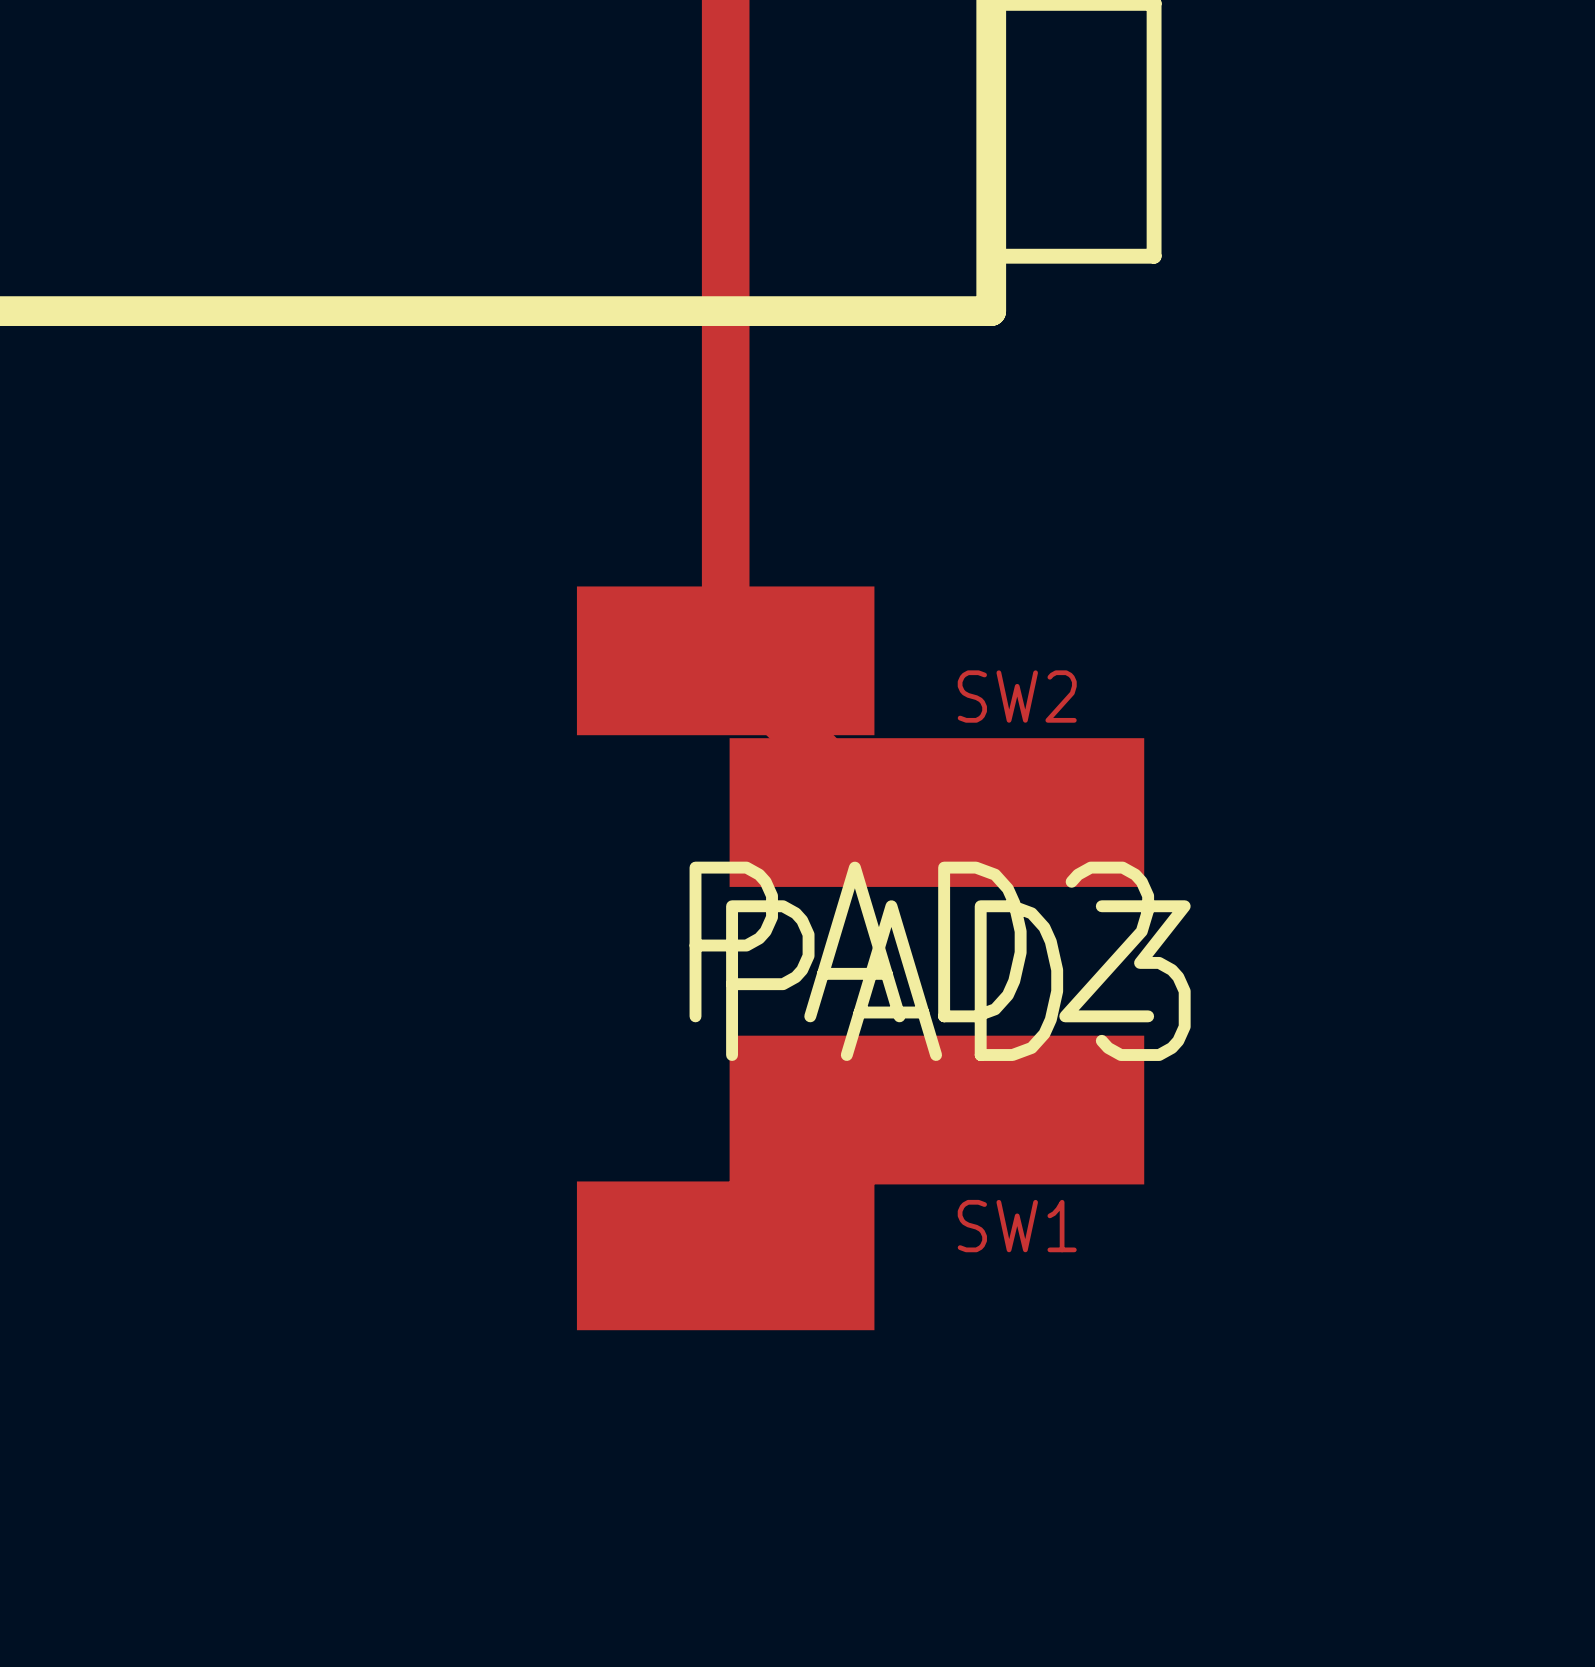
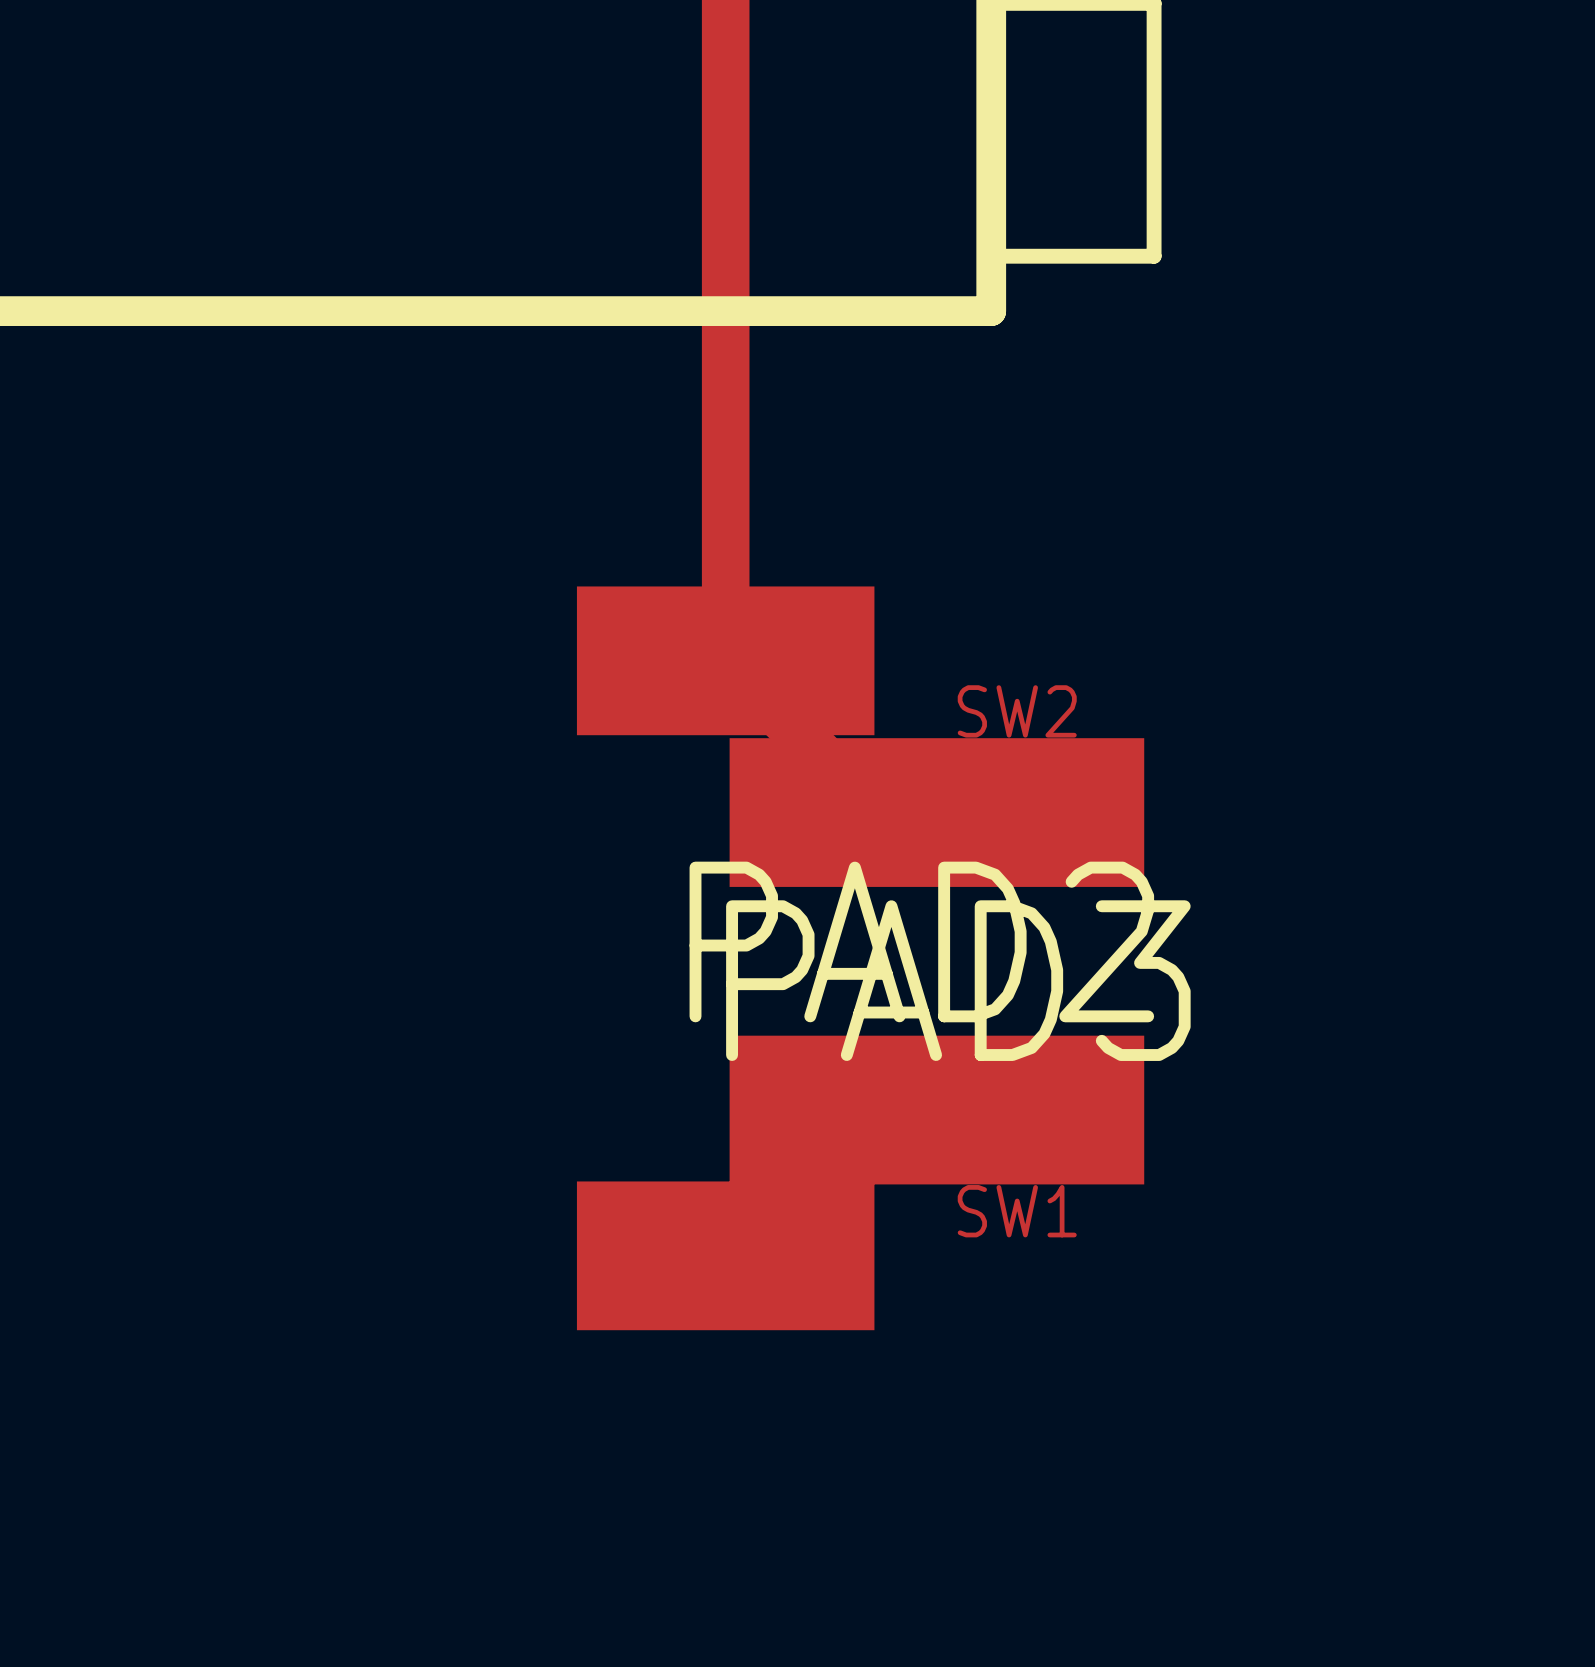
text position: SW2 (1017, 696) -> SW2 (1017, 711)
text position: SW1 (1017, 1226) -> SW1 (1017, 1211)

